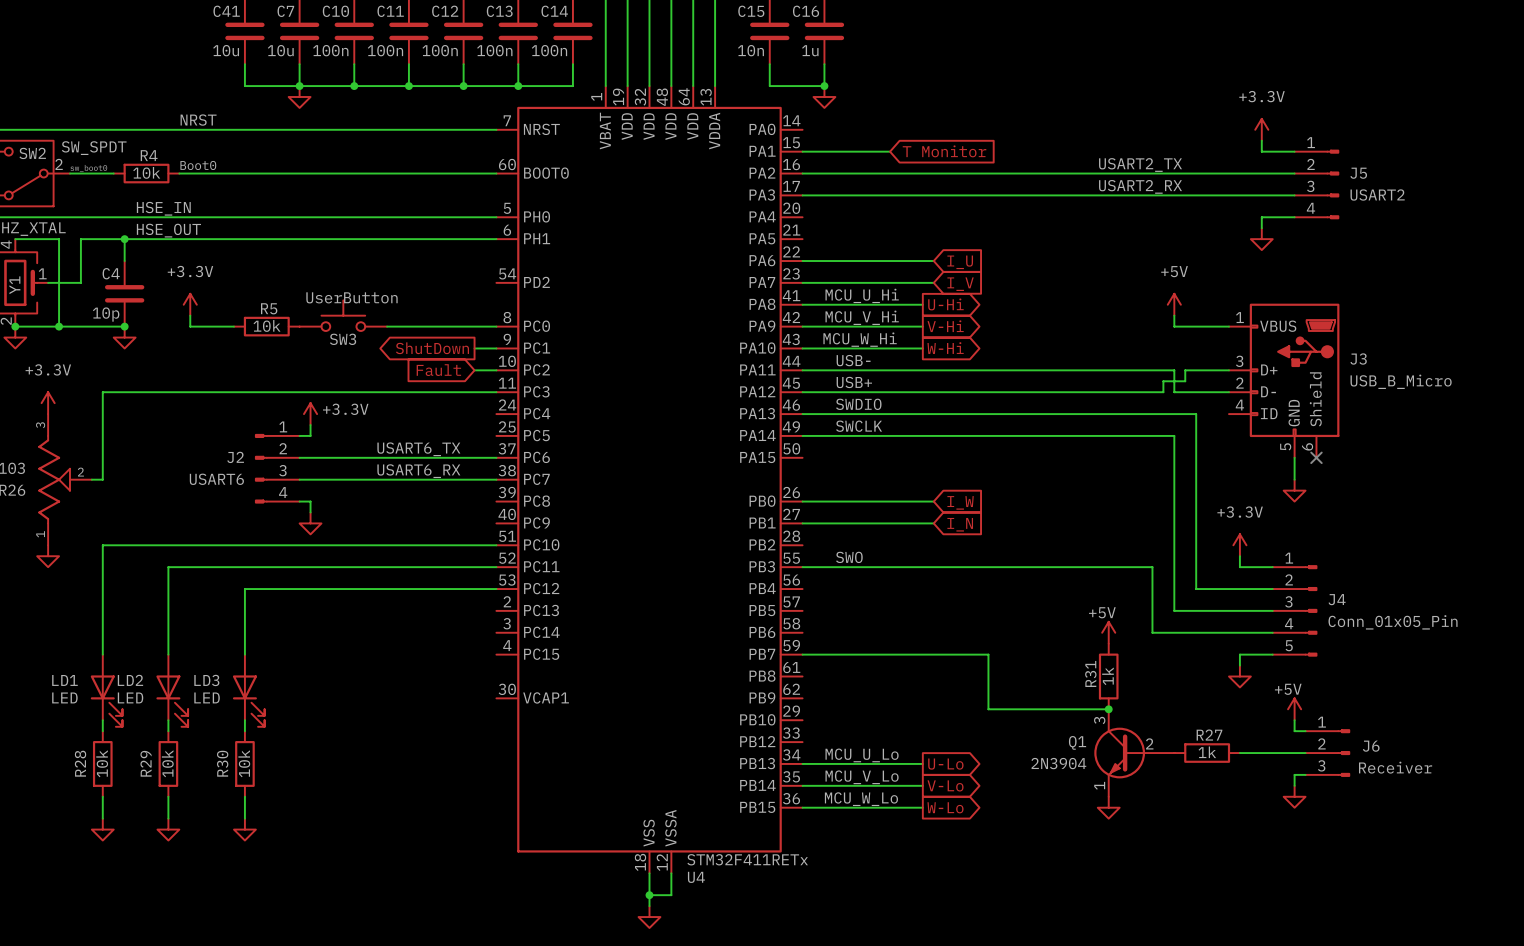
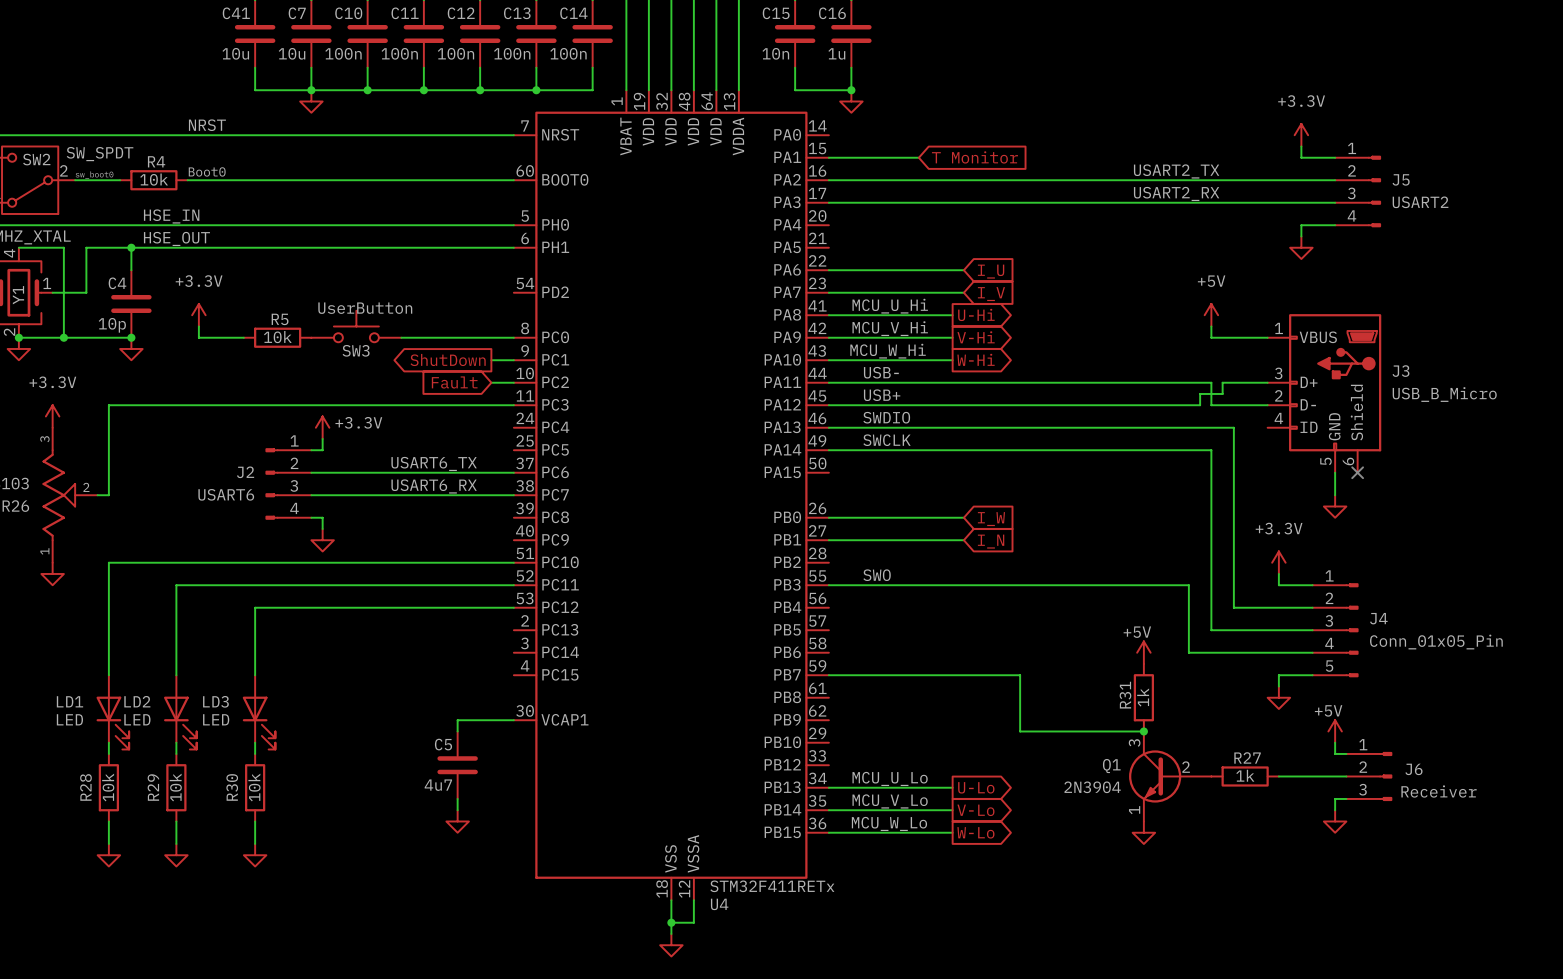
wire: none -> (513, 720) (457, 720) (457, 731)
C5: none -> 4u7 (457, 765)
wire: none -> (457, 798) (457, 810)
power symbol: none -> (457, 821)

